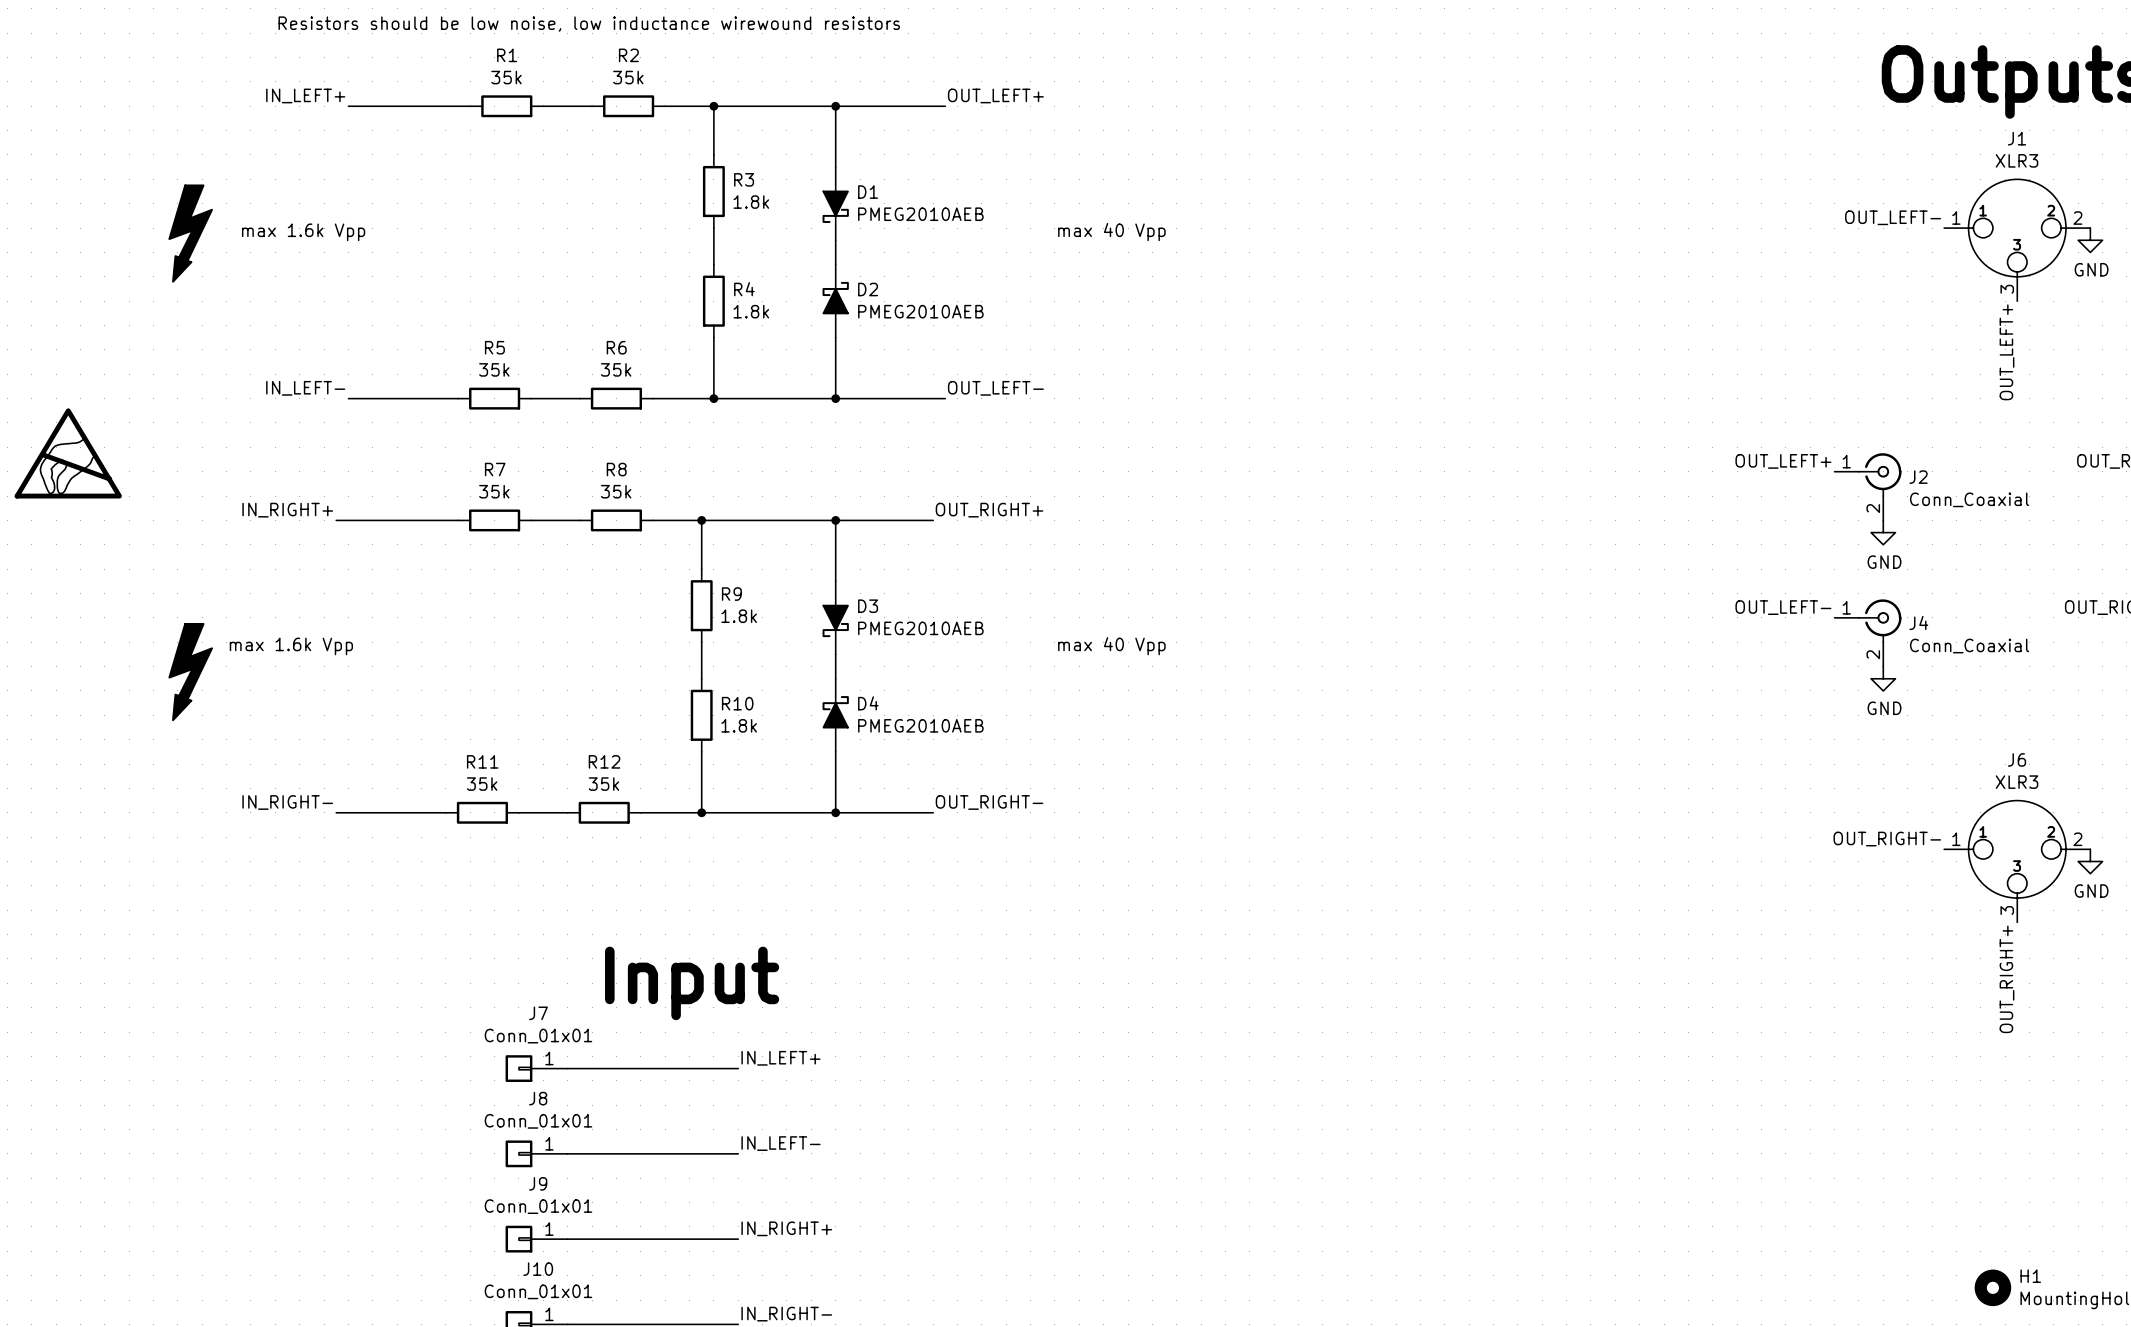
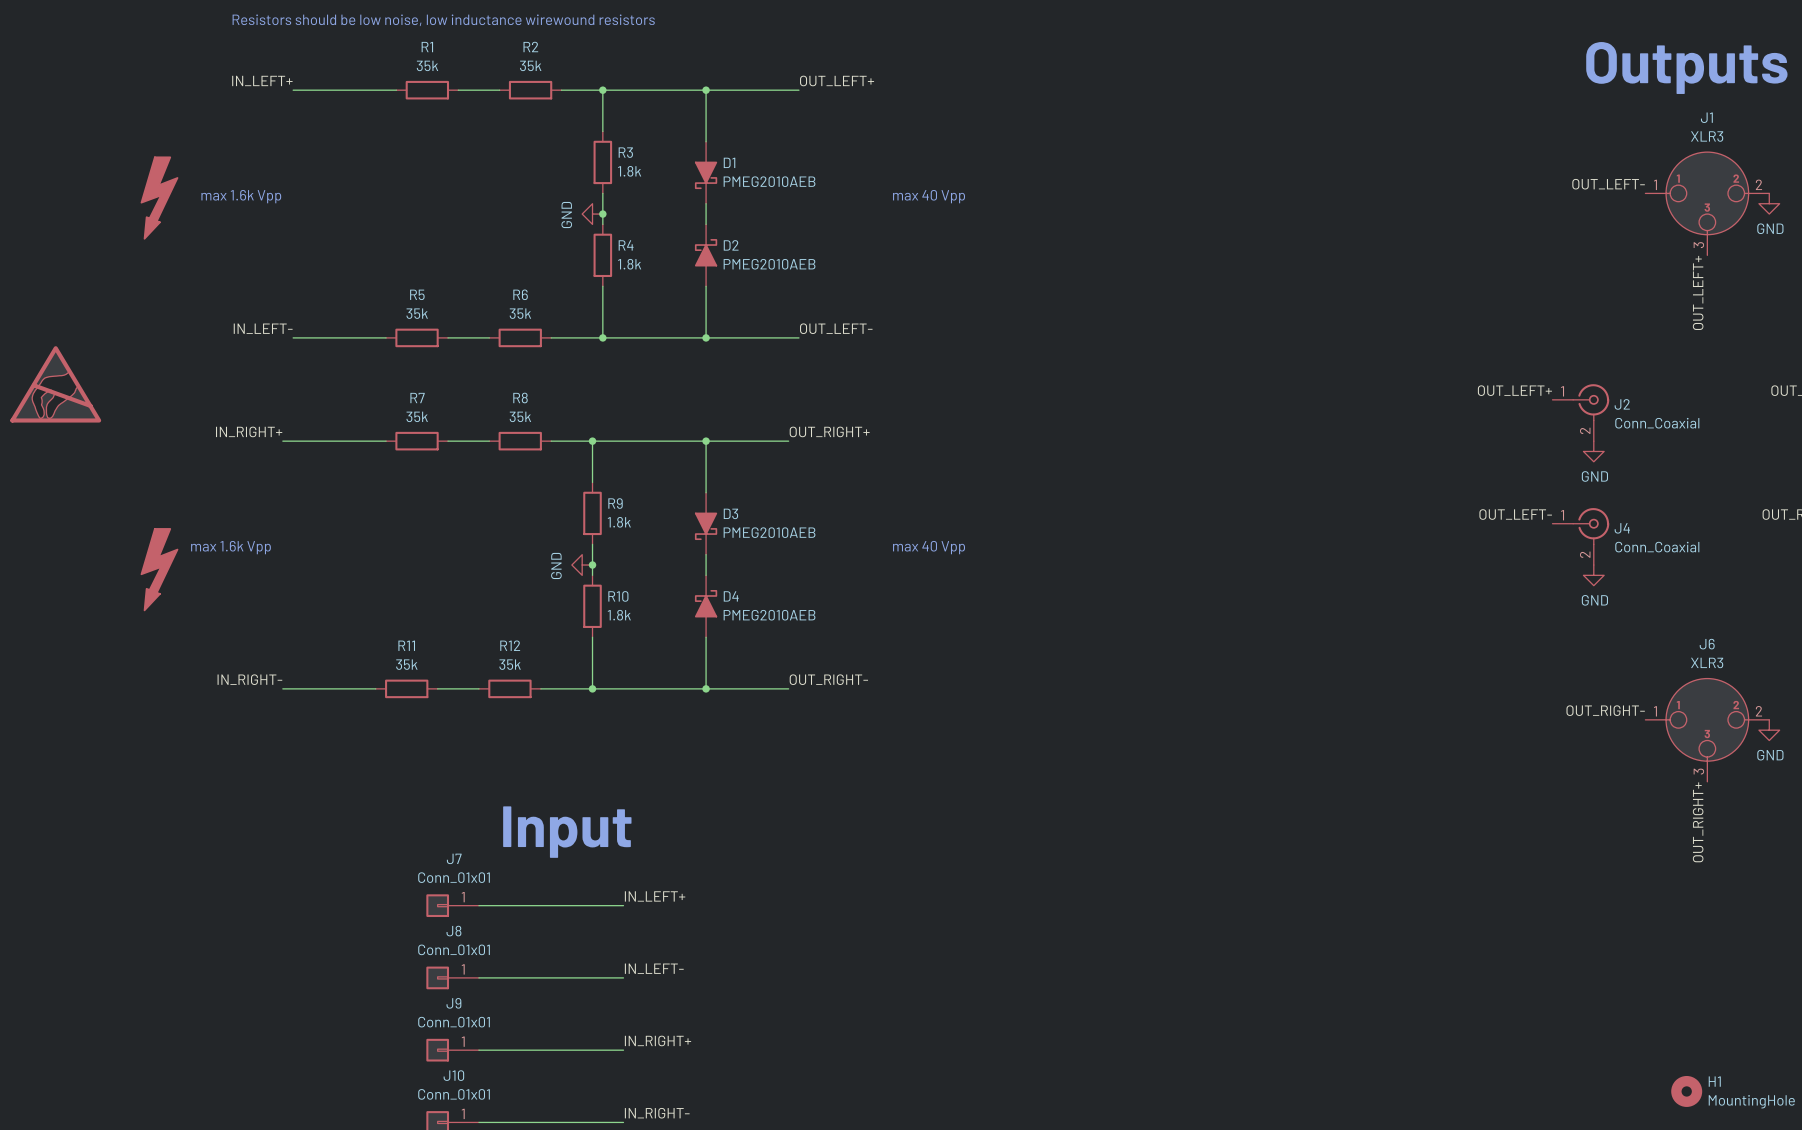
power symbol: none -> GND (592, 214)
junction: none -> (602, 214)
power symbol: none -> GND (582, 565)
junction: none -> (592, 565)

